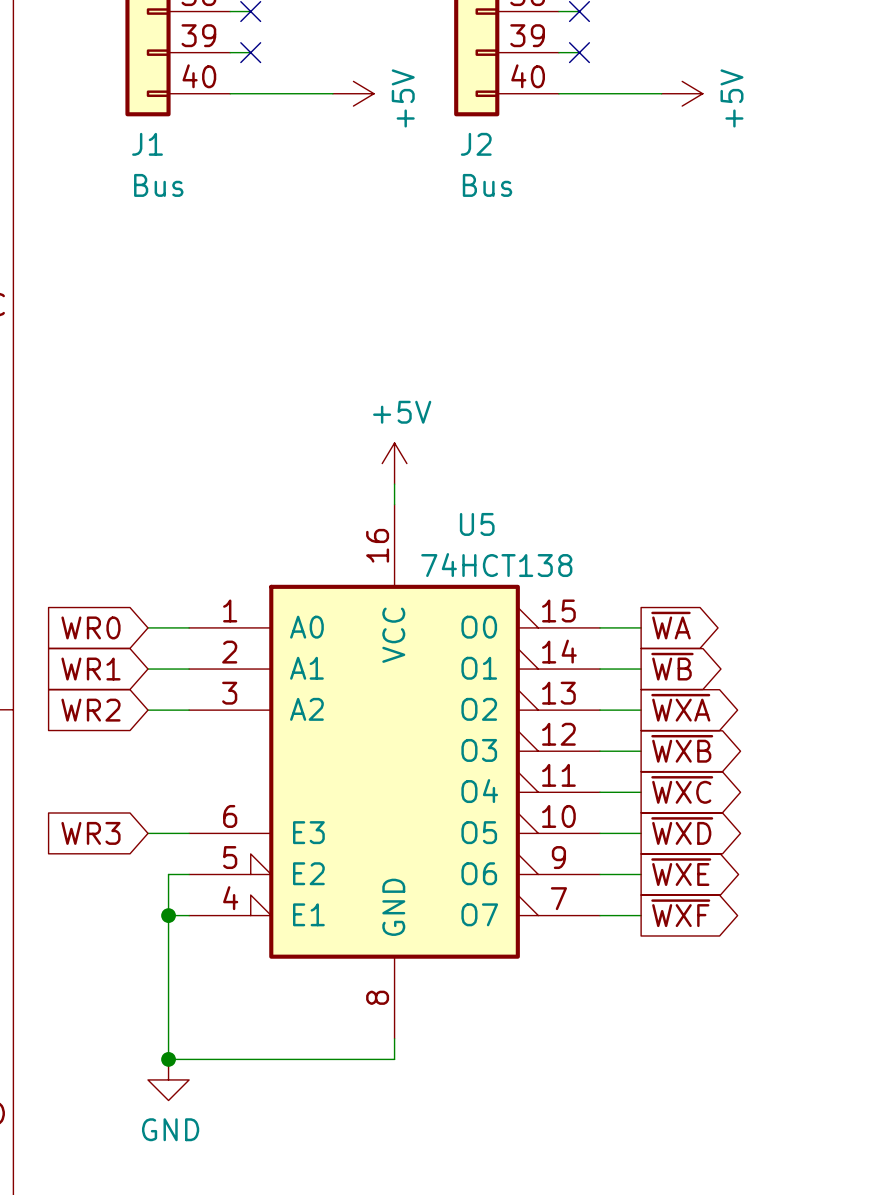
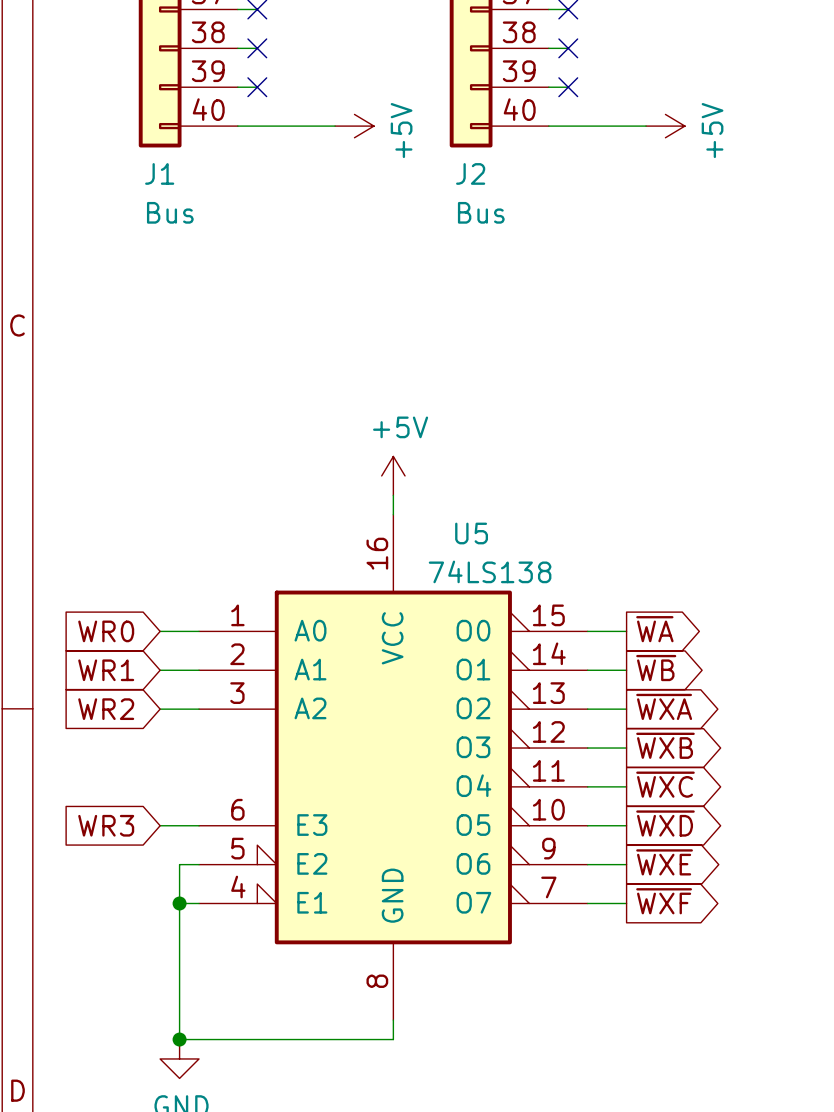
U5 value: 74HCT138 (496, 565) -> 74LS138 (490, 571)

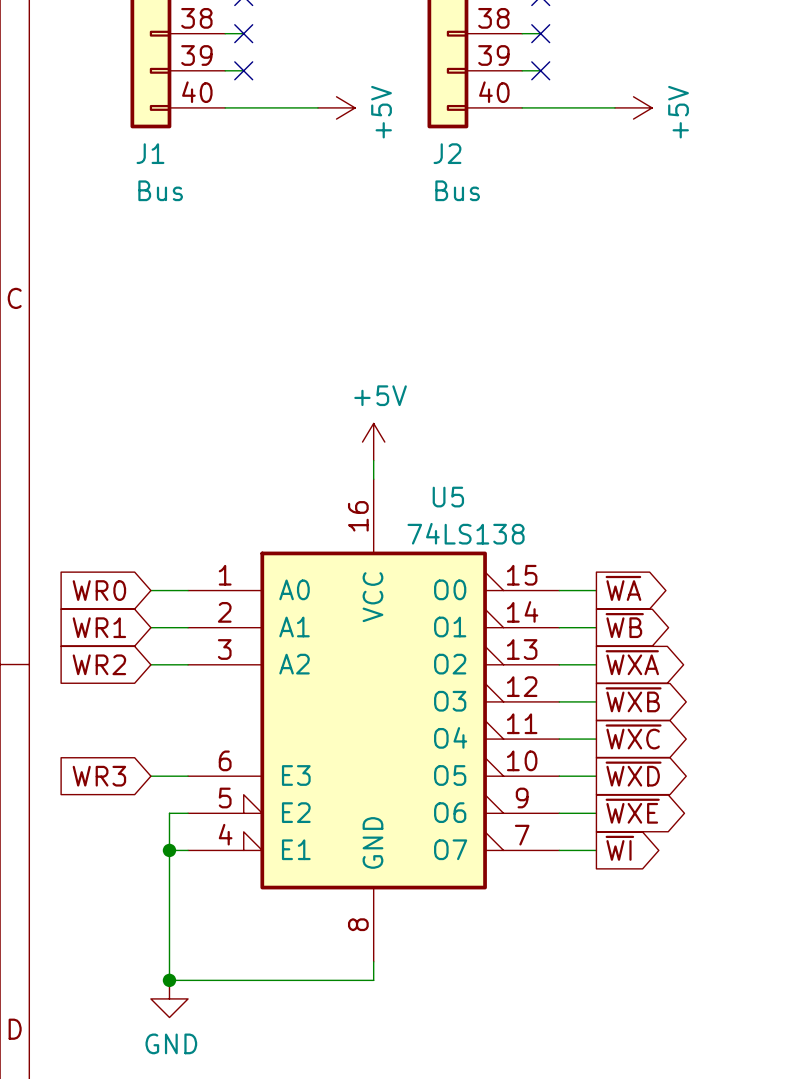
global label: ~{WXF} (664, 901) -> ~{WI} (619, 848)

